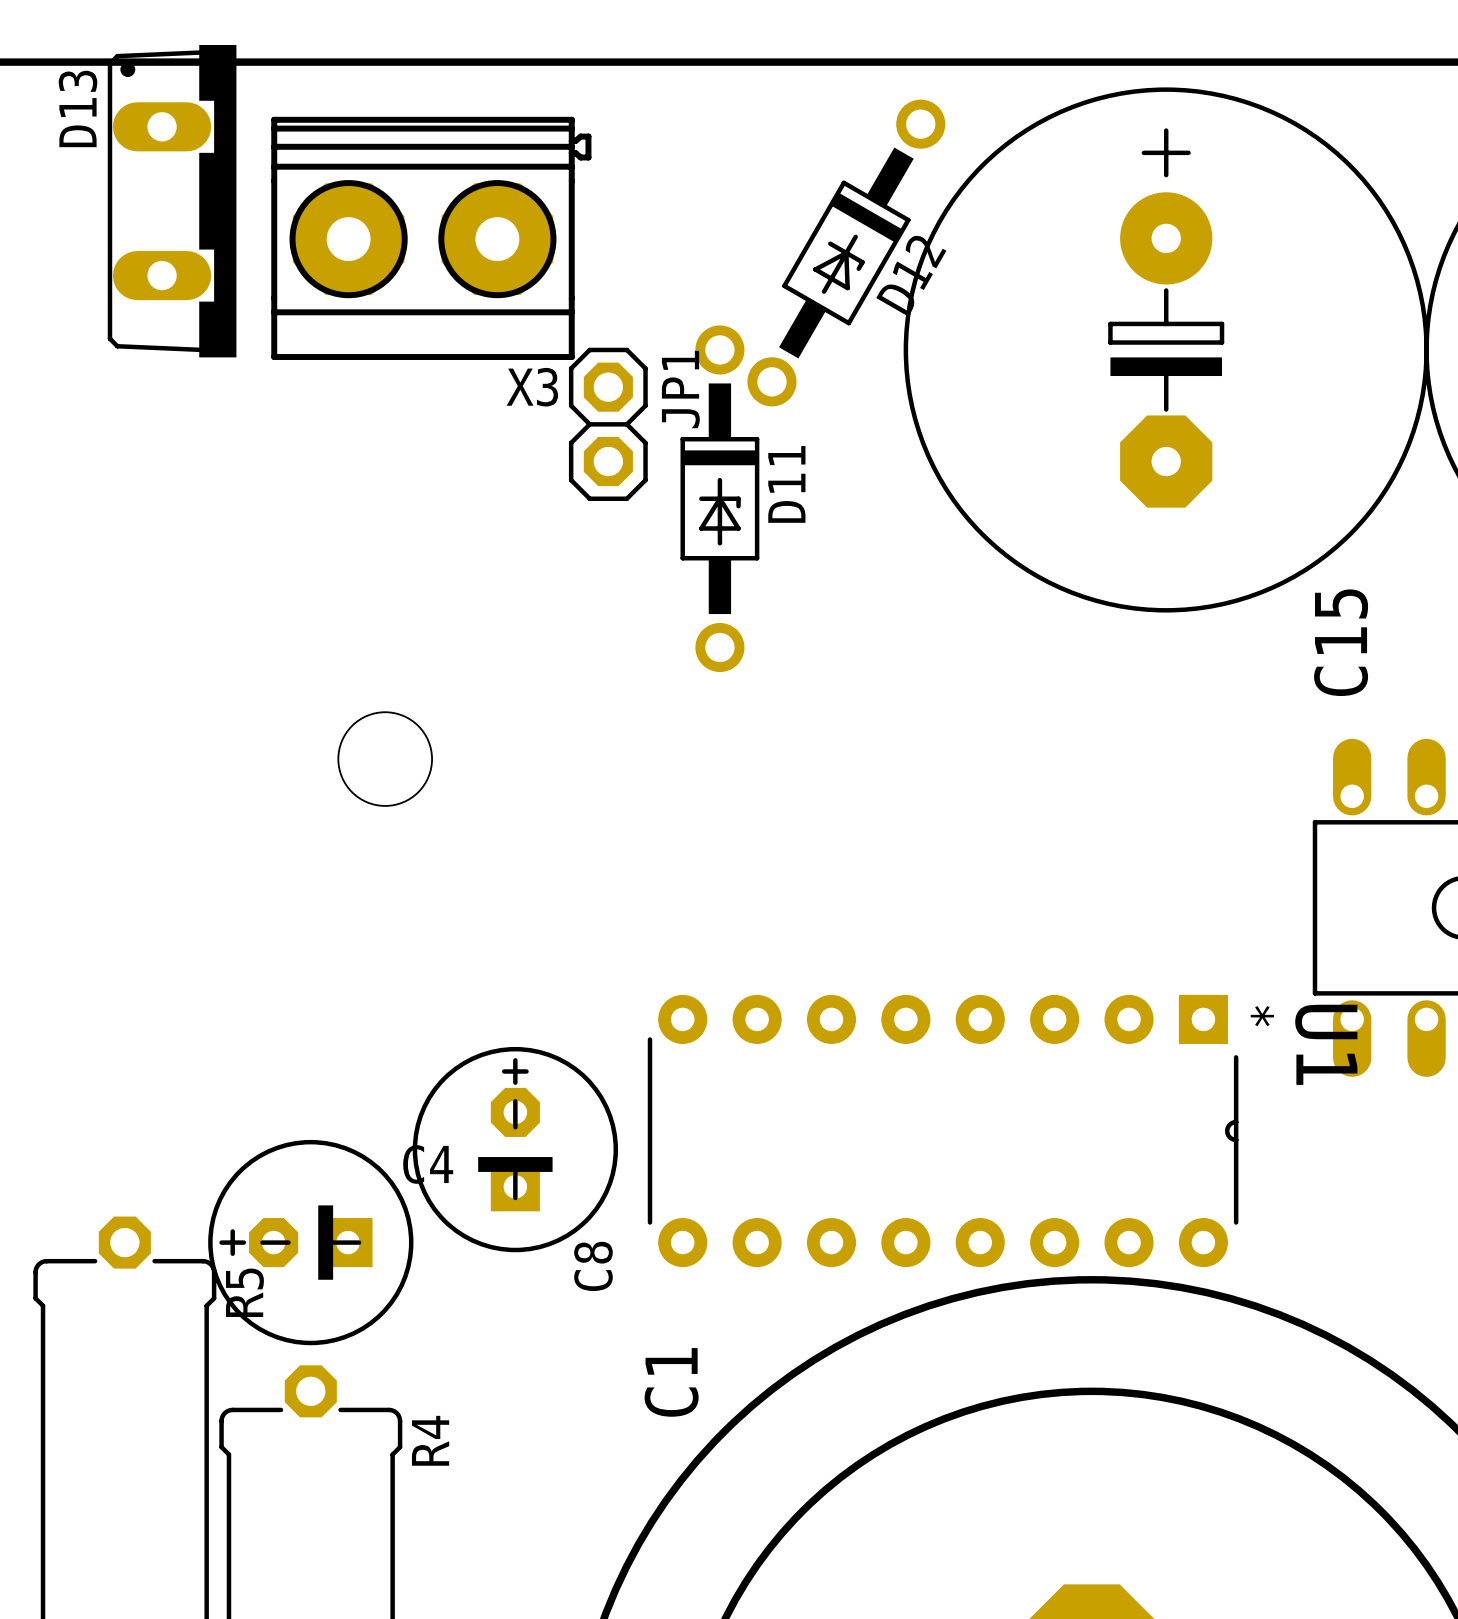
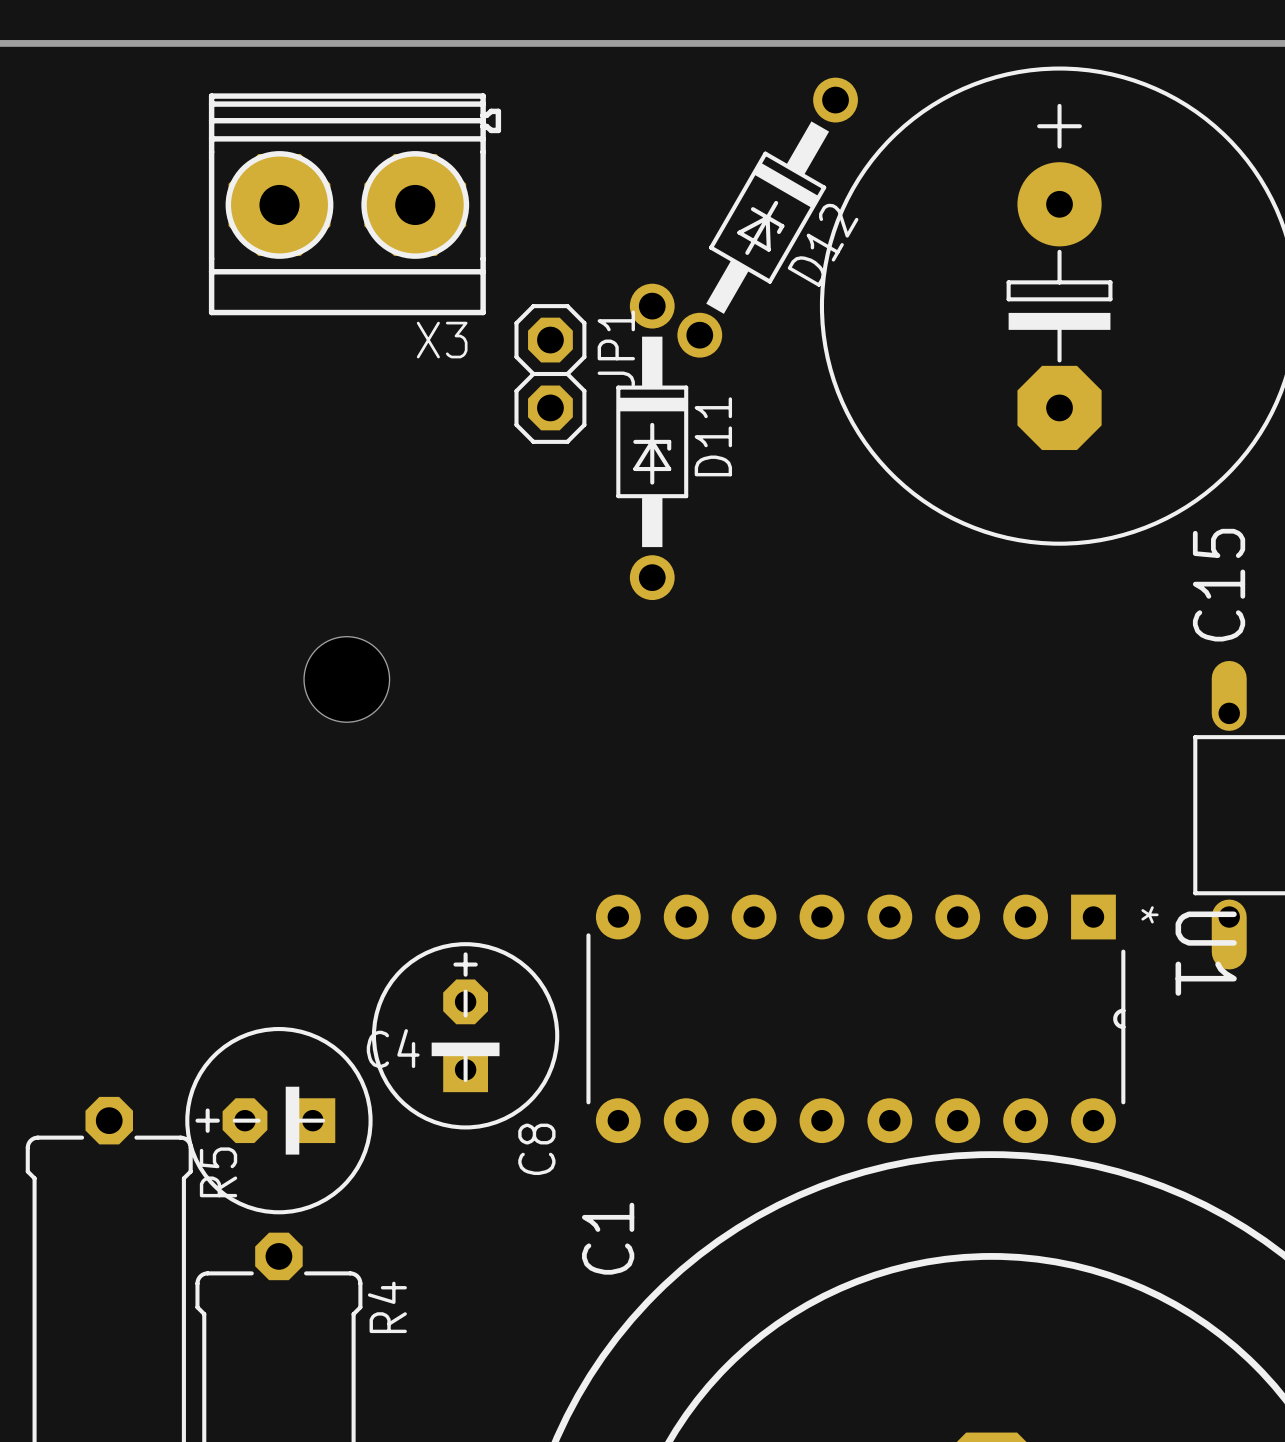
D13: (172, 201) -> none
X3 position: (431, 238) -> (354, 204)

